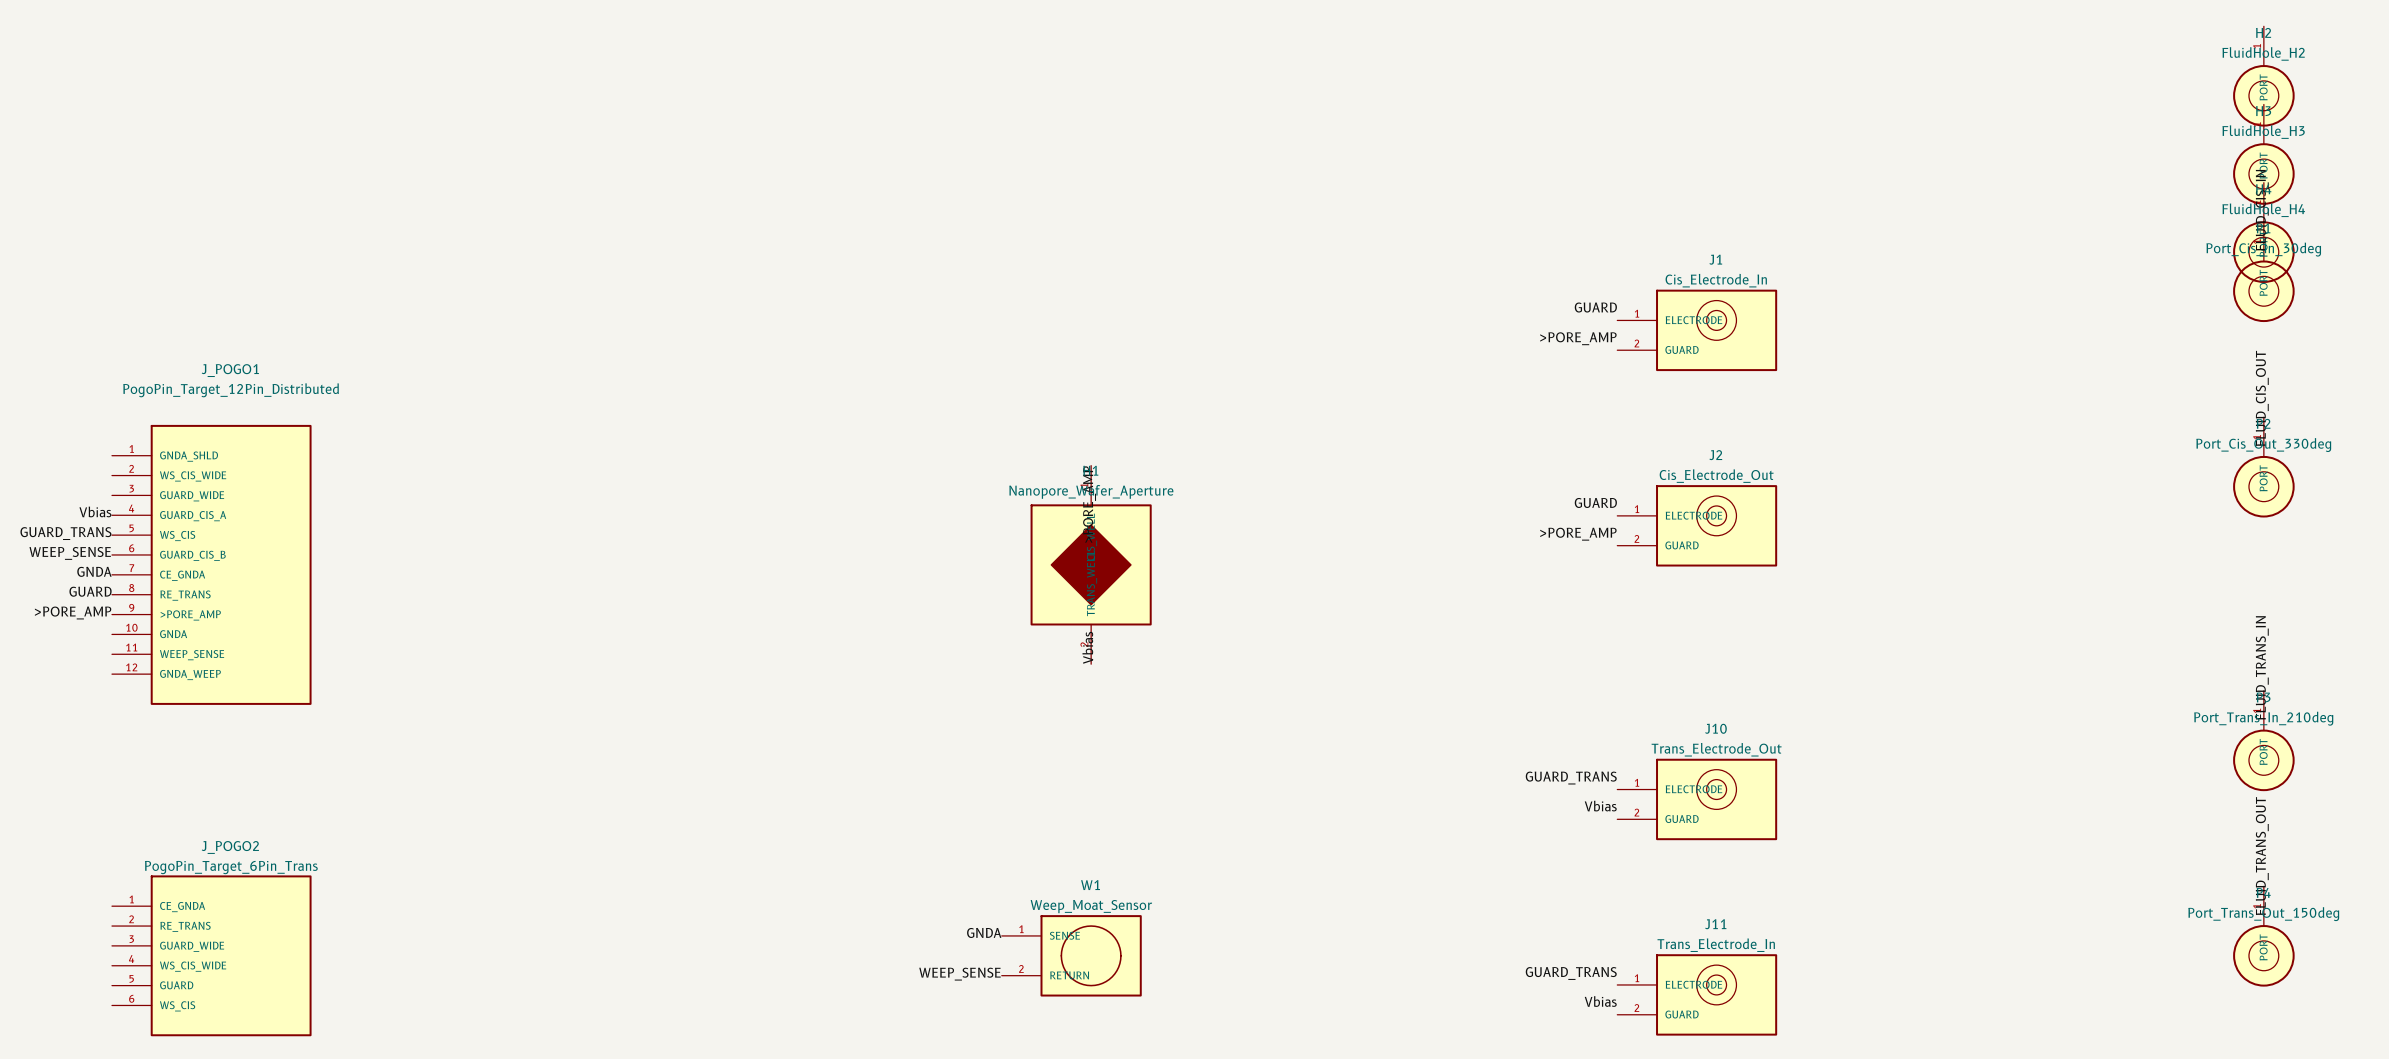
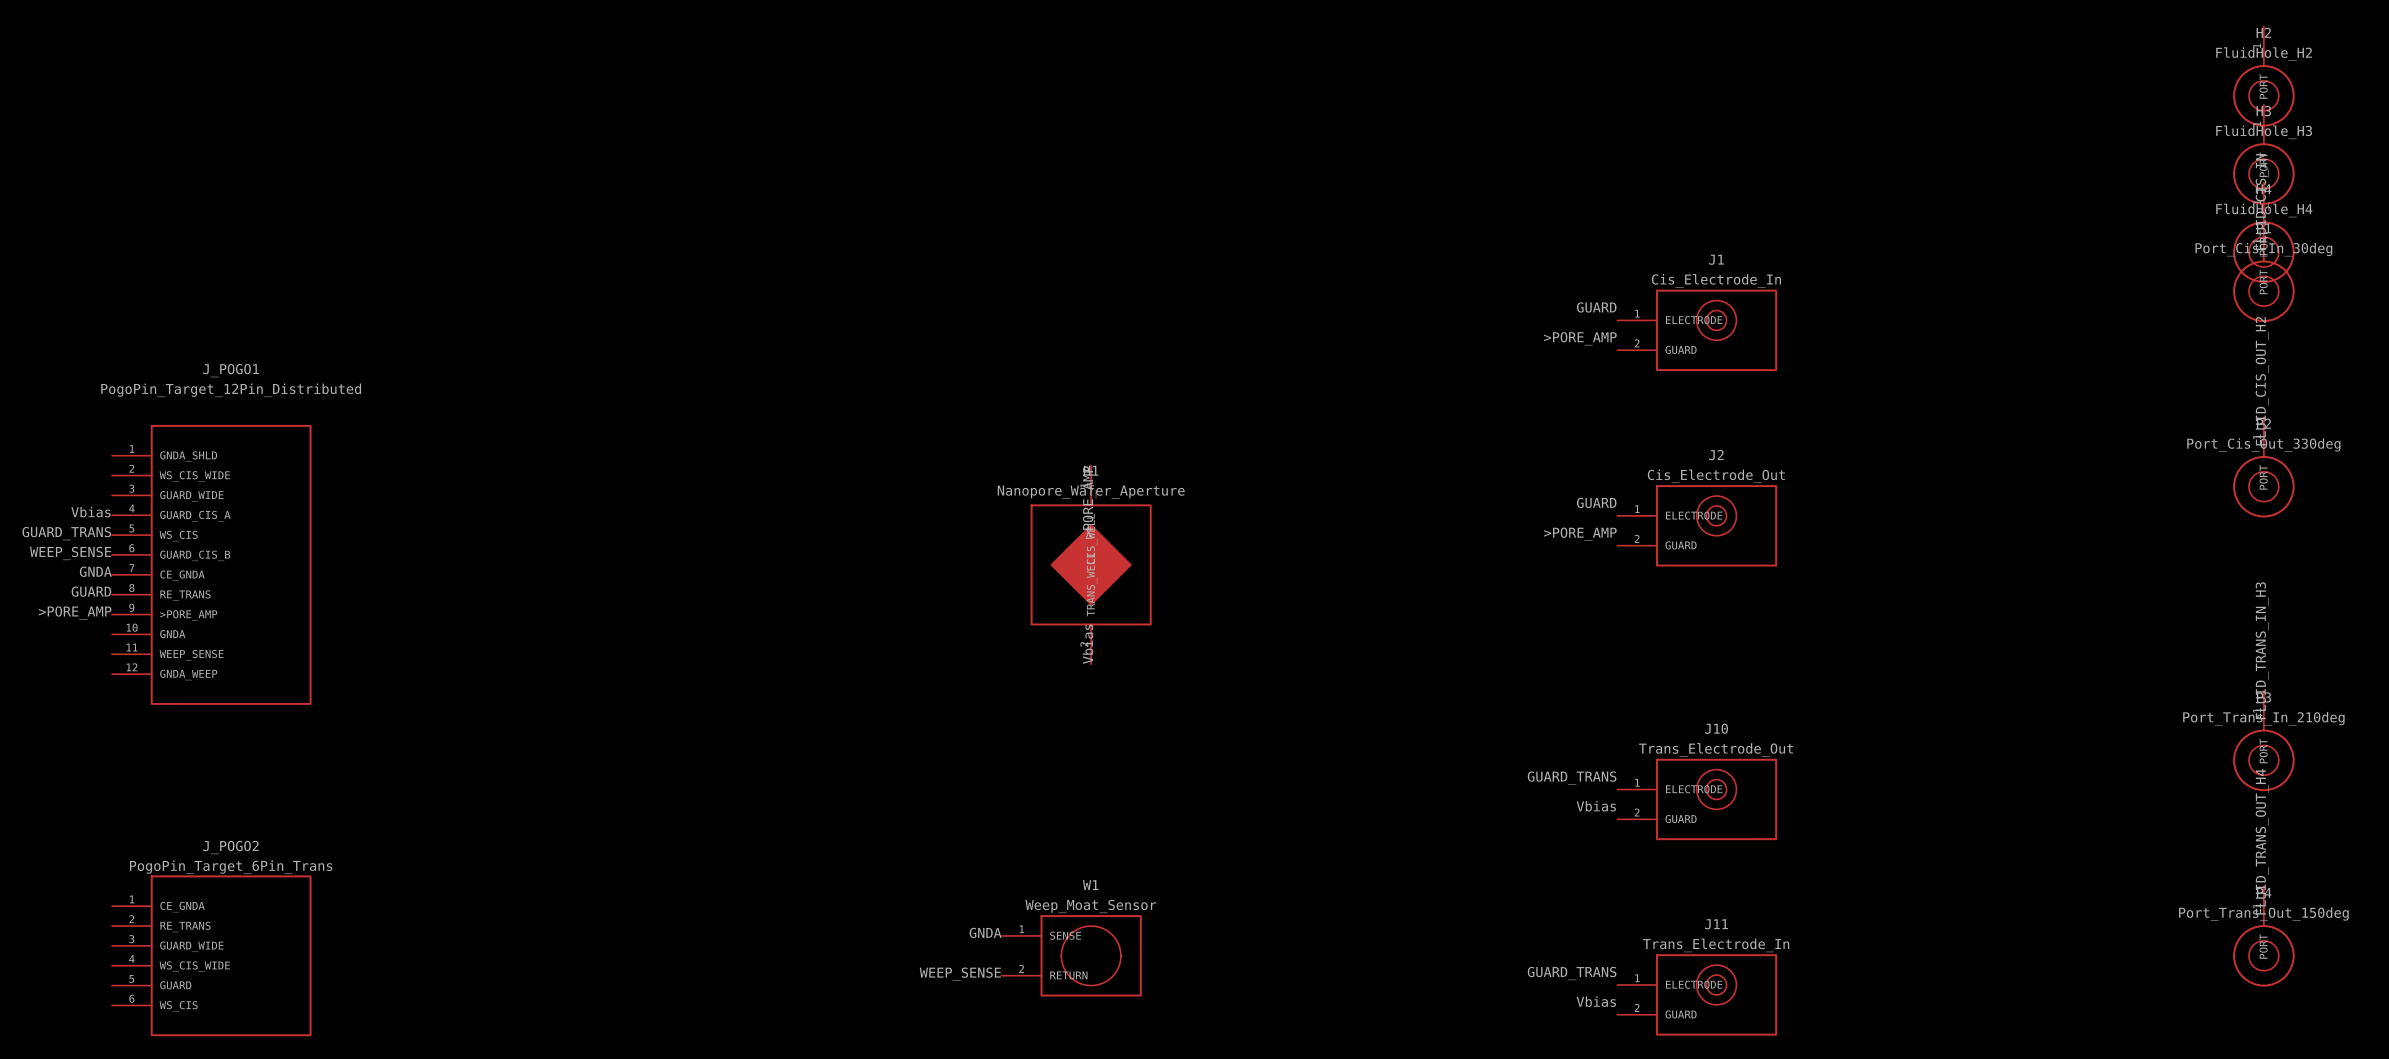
label: FLUID_CIS_OUT (2262, 398) -> FLUID_CIS_OUT_H2 (2262, 381)
label: FLUID_TRANS_IN (2262, 667) -> FLUID_TRANS_IN_H3 (2262, 650)
label: FLUID_TRANS_OUT (2262, 856) -> FLUID_TRANS_OUT_H4 (2262, 841)

